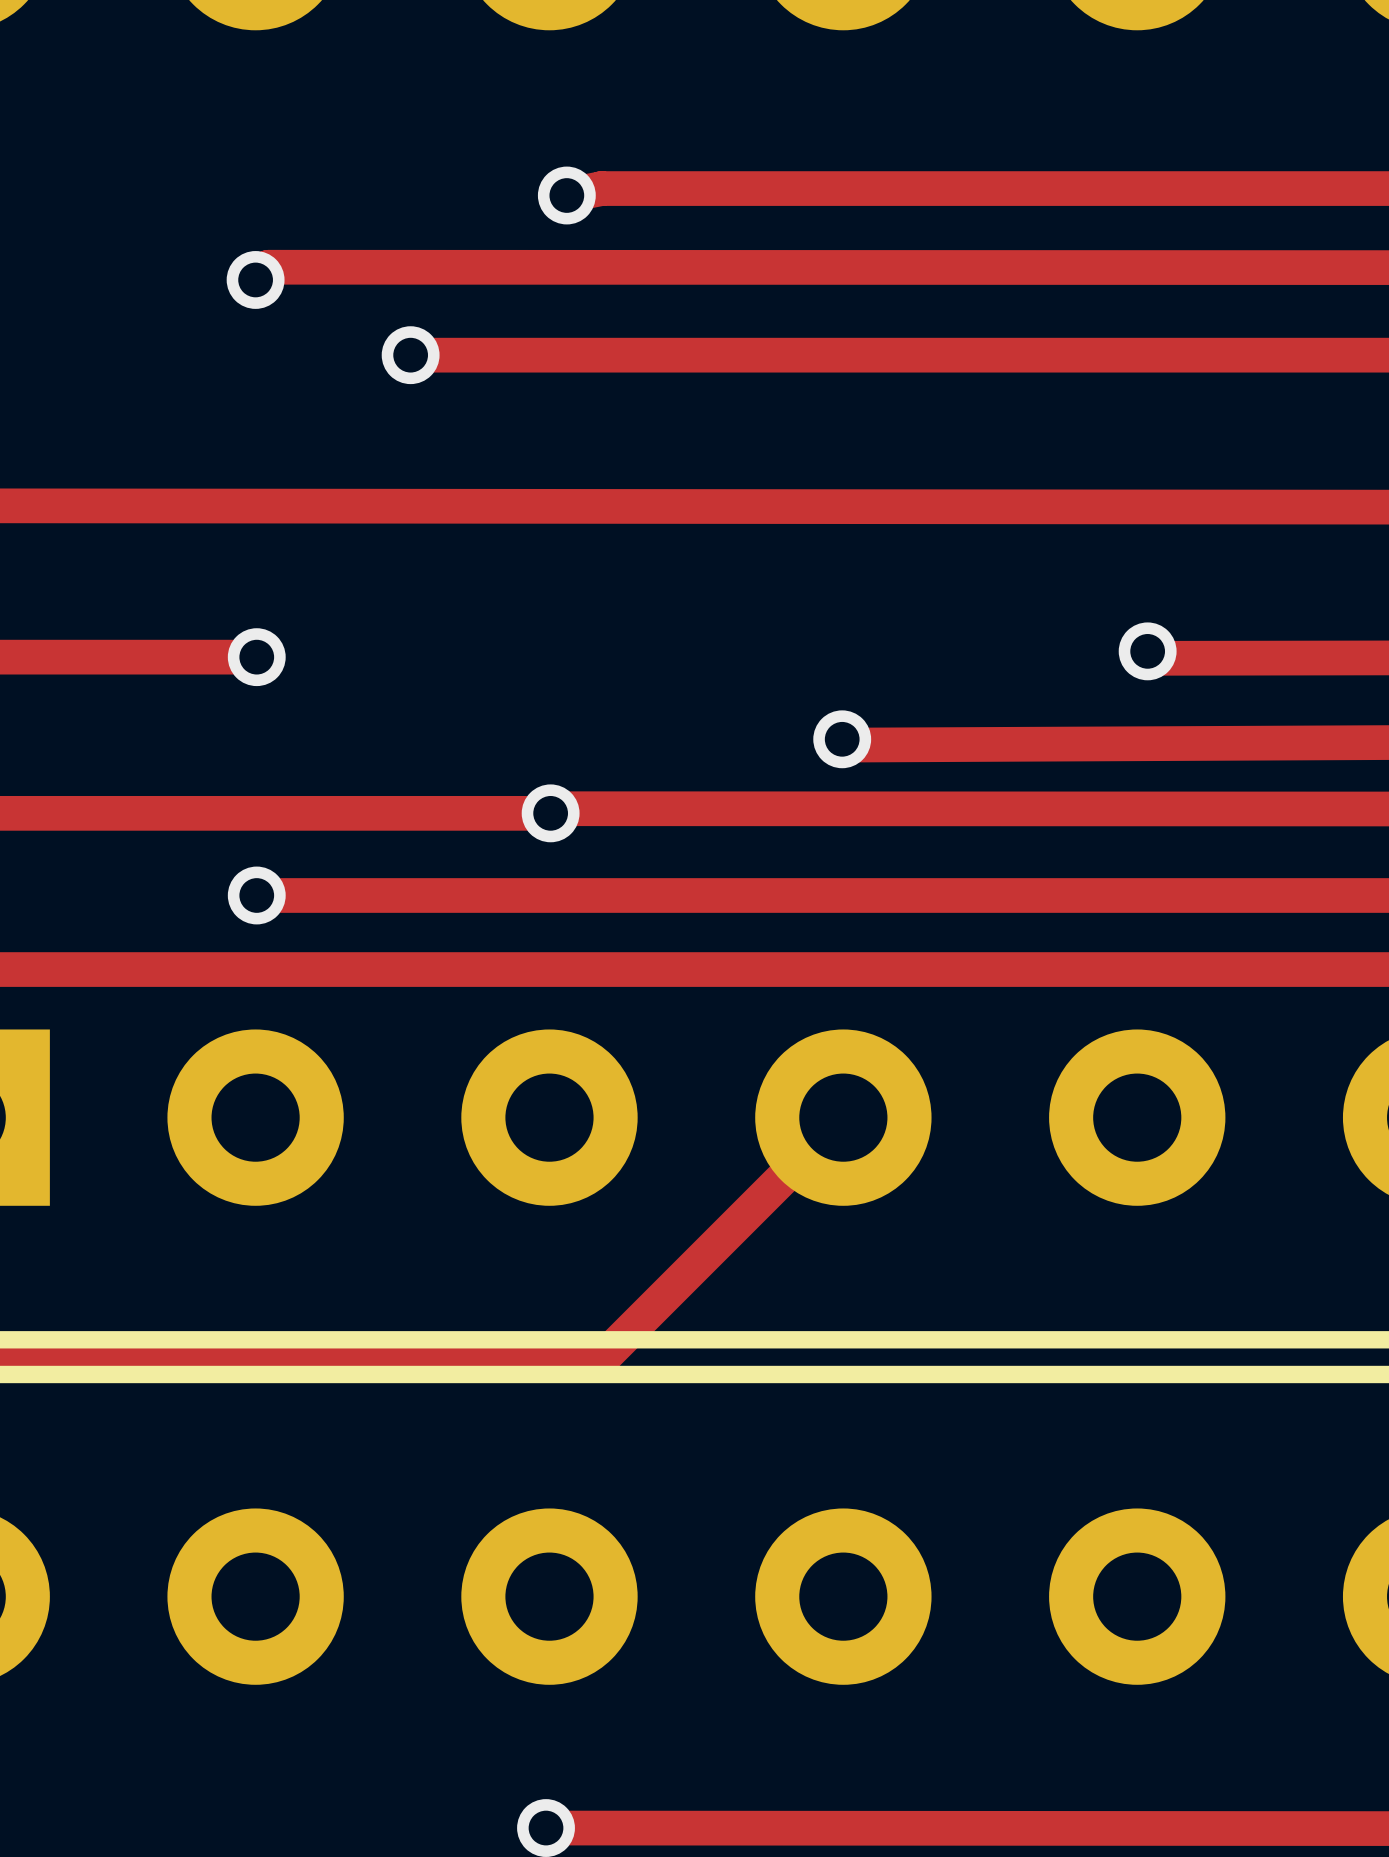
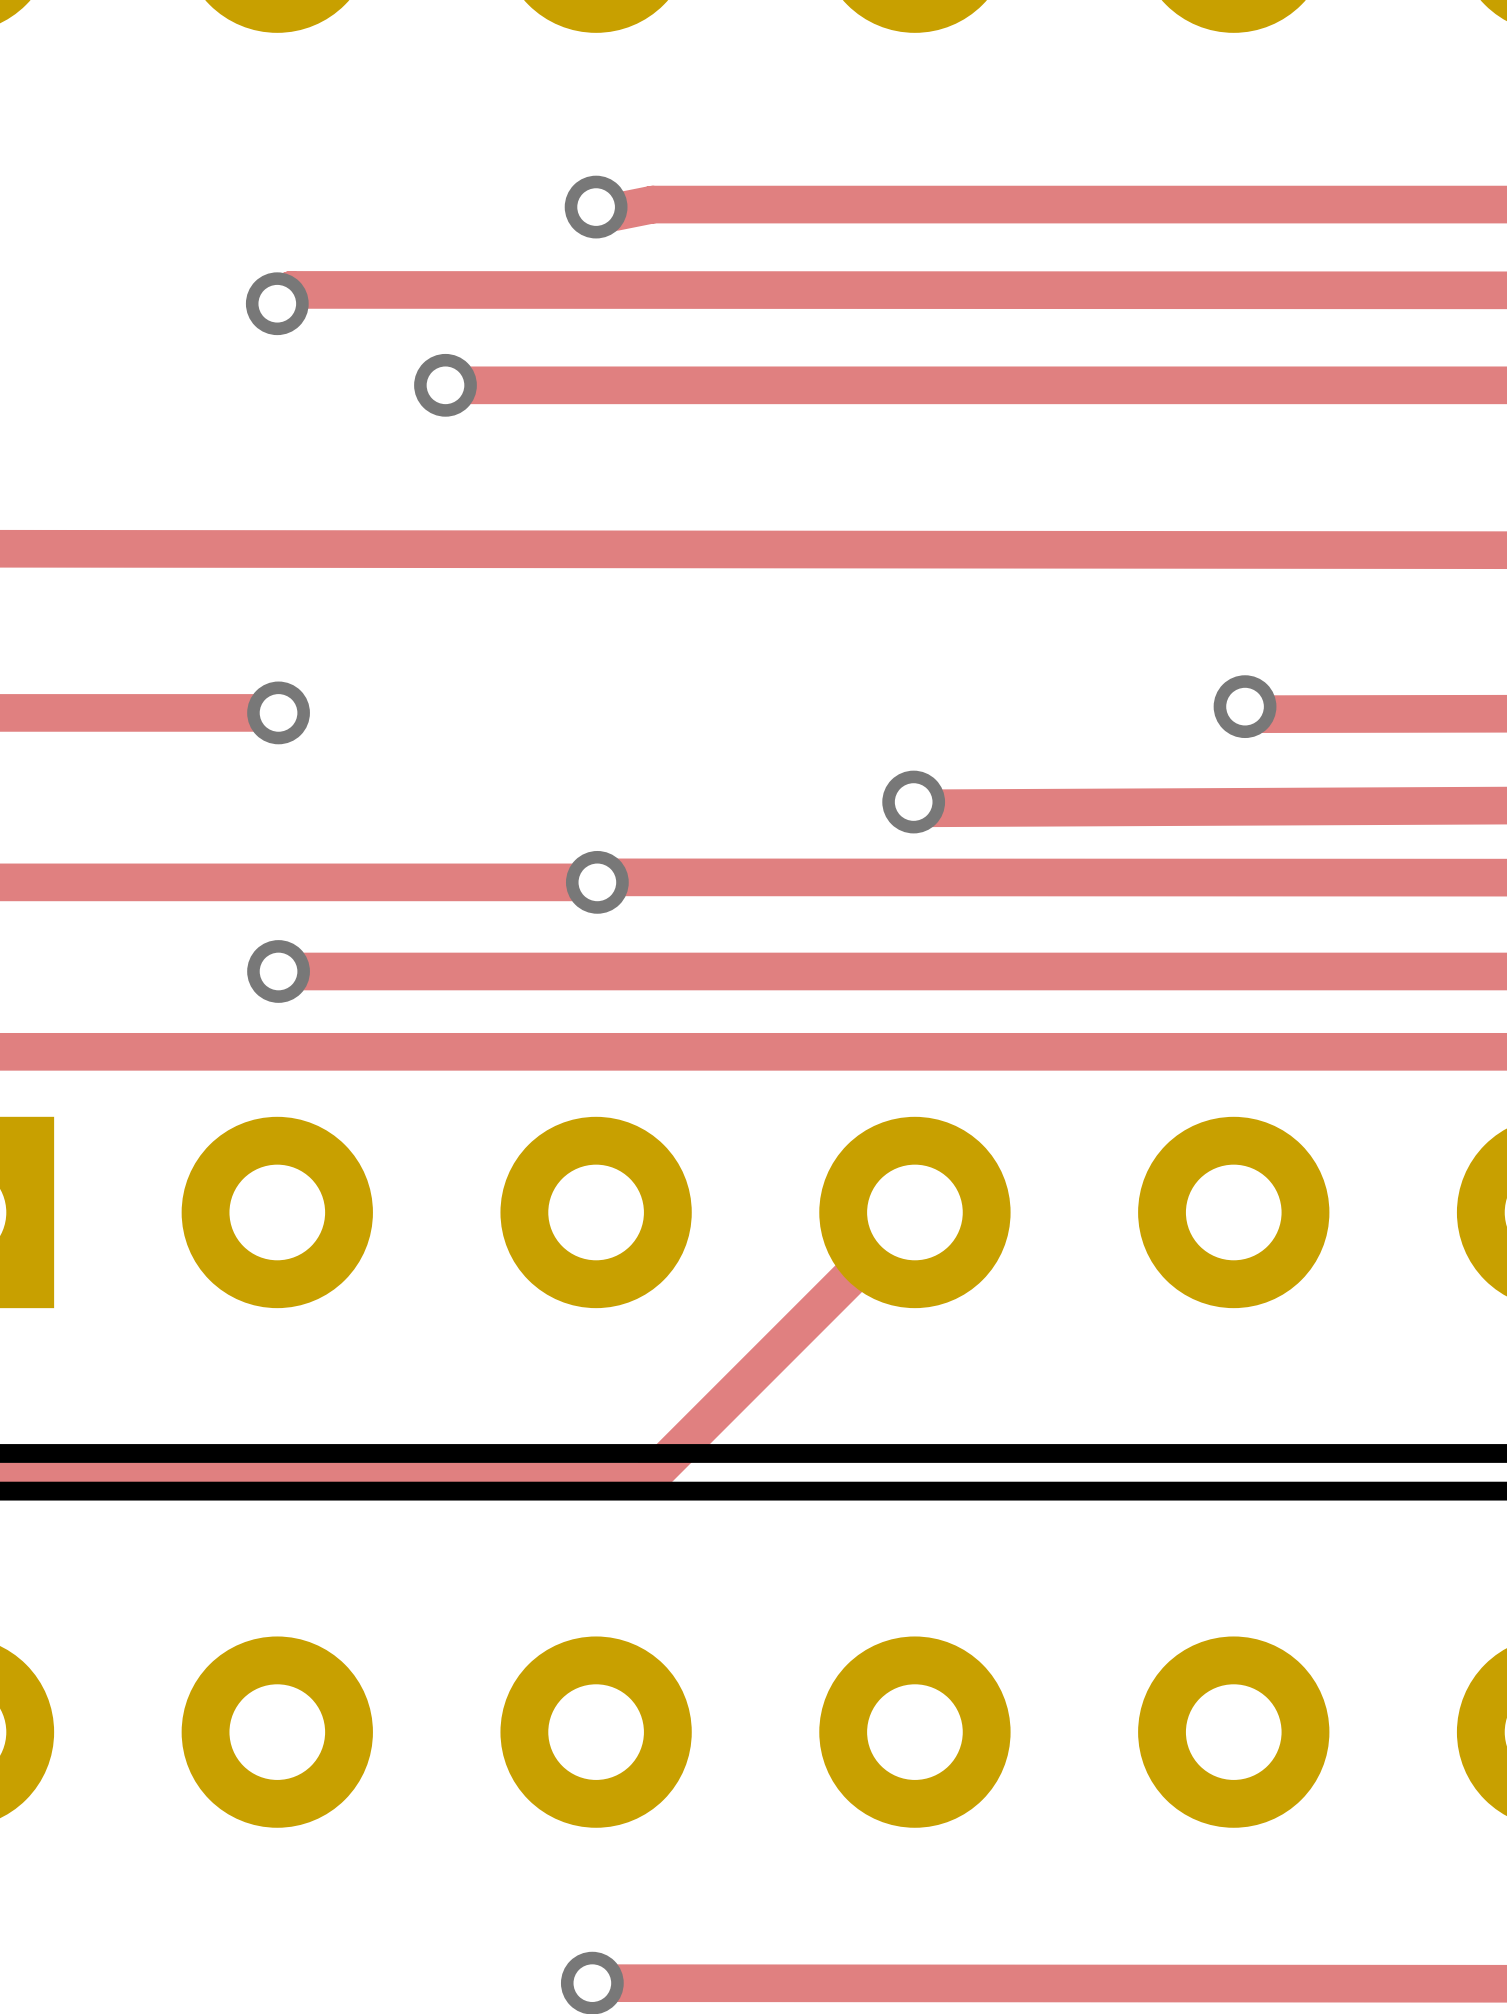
via position: (566, 195) -> (596, 207)

